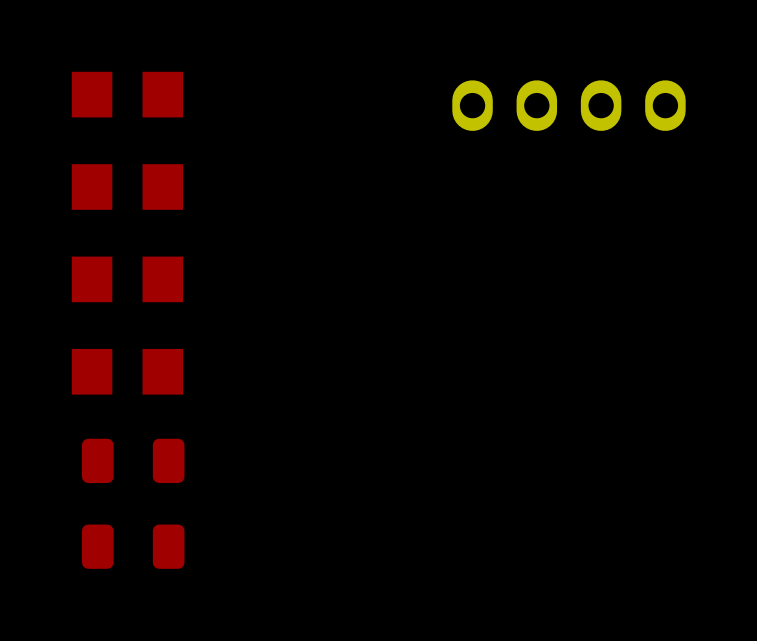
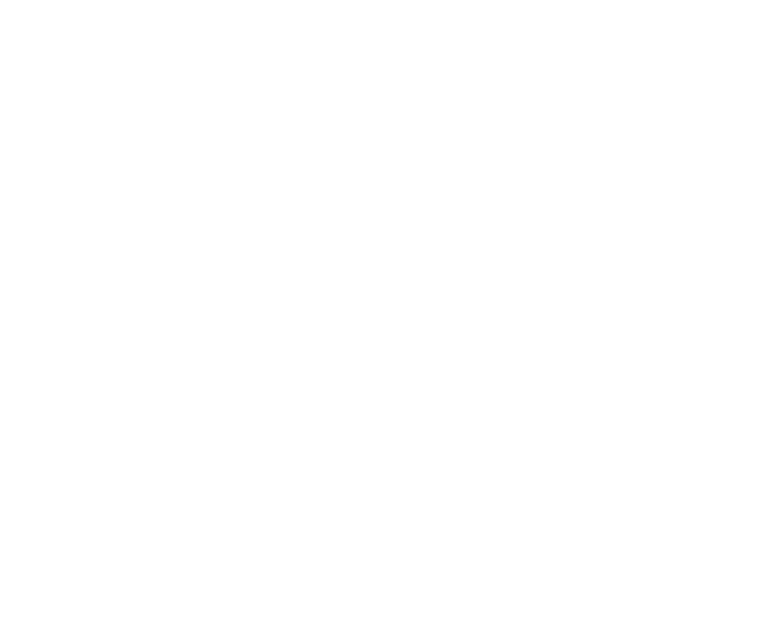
part: (127, 94) -> none
part: (568, 105) -> none
part: (127, 187) -> none
part: (127, 279) -> none
part: (127, 371) -> none
part: (133, 460) -> none
part: (133, 546) -> none

